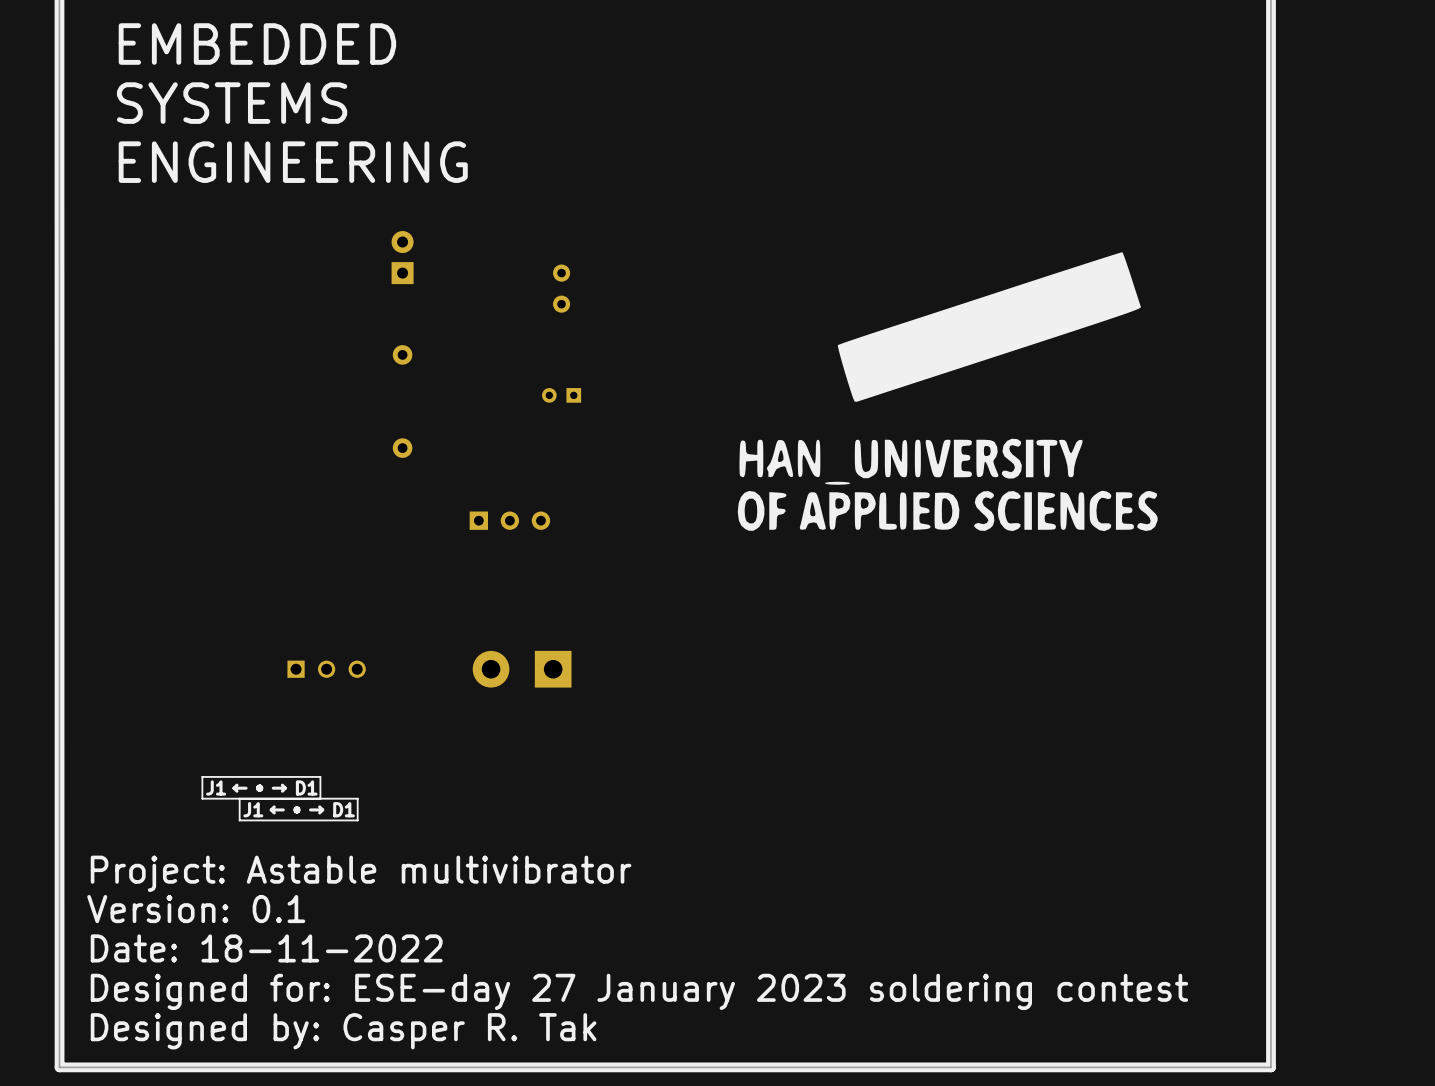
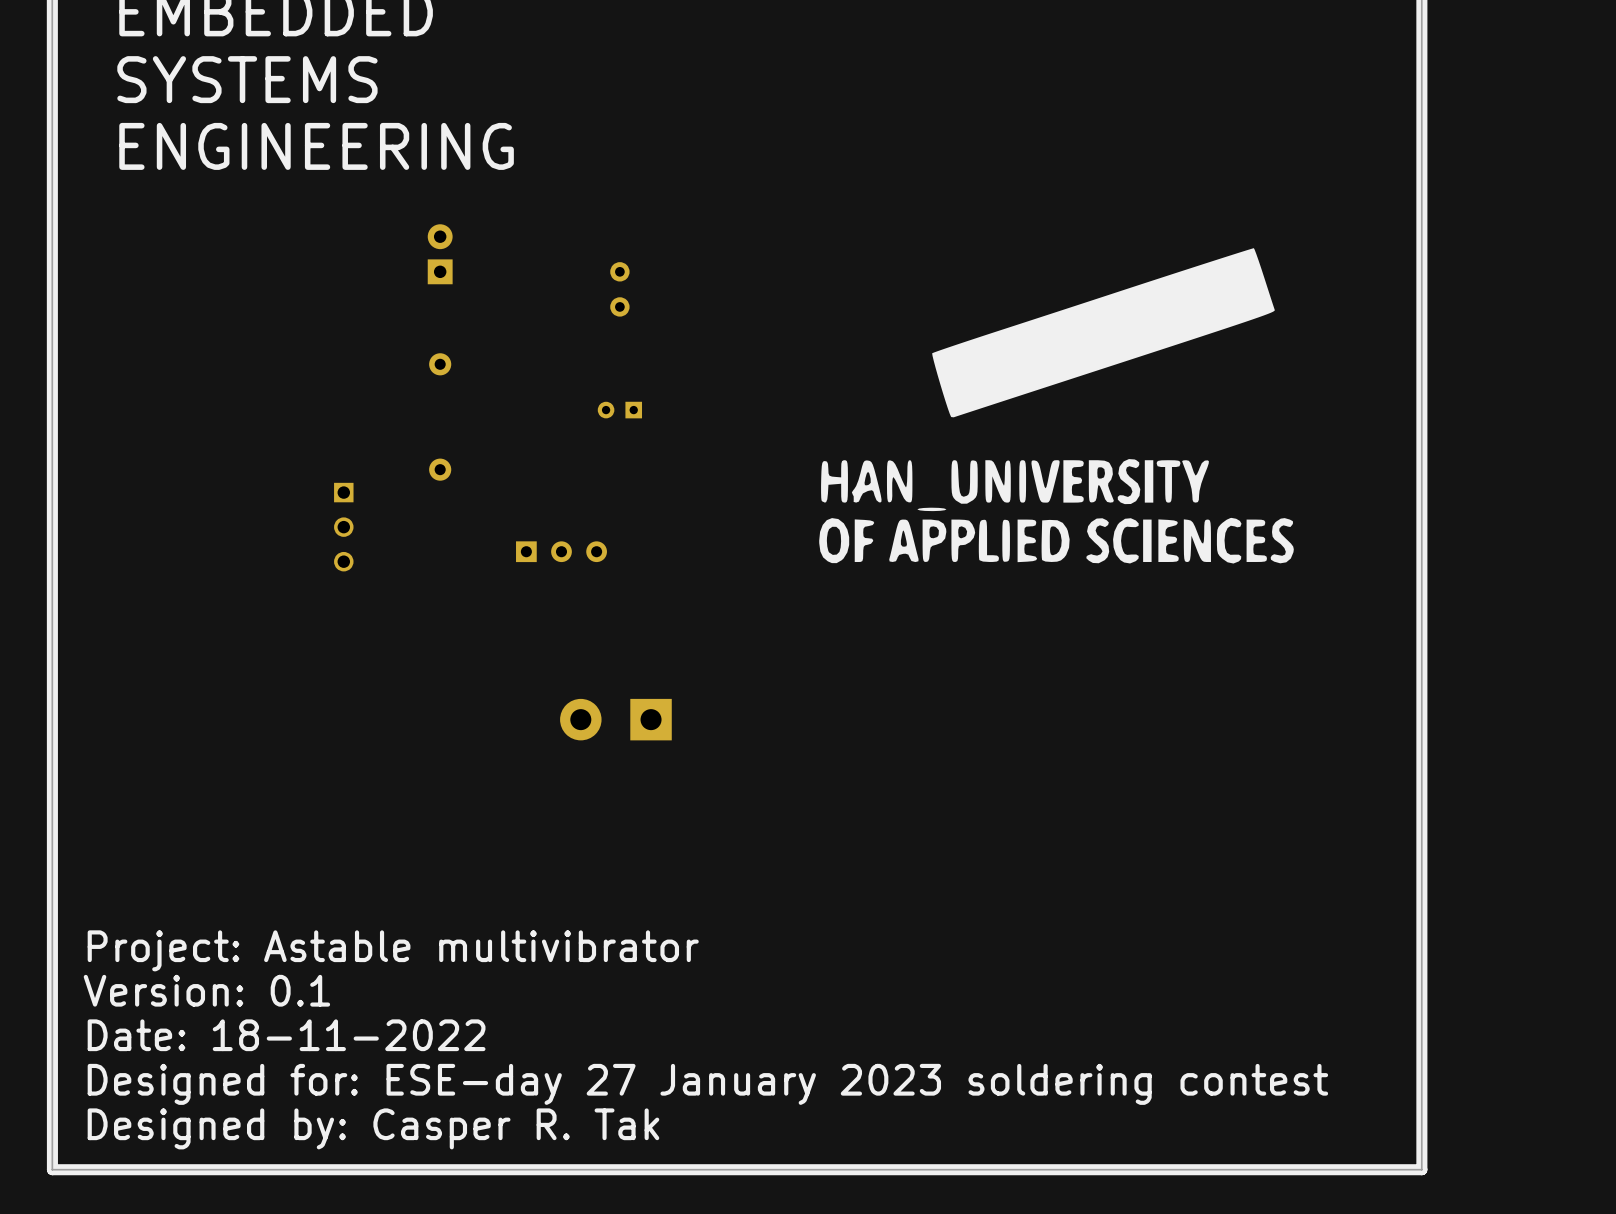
part rotation: 0° (326, 669) -> 90° clockwise (343, 527)
part position: (326, 669) -> (343, 527)
part position: (522, 669) -> (615, 719)
text: J1 (216, 787) -> none
text: D1 (306, 787) -> none
text: ←•→ (259, 788) -> none
line: (320, 798) (320, 776) (202, 776) (202, 798) (357, 798) (357, 820) (239, 820) (239, 798) -> none
text: J1 (253, 809) -> none
text: ←•→ (296, 809) -> none
text: D1 (344, 809) -> none

